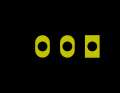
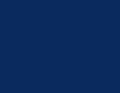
part: (67, 46) -> none

